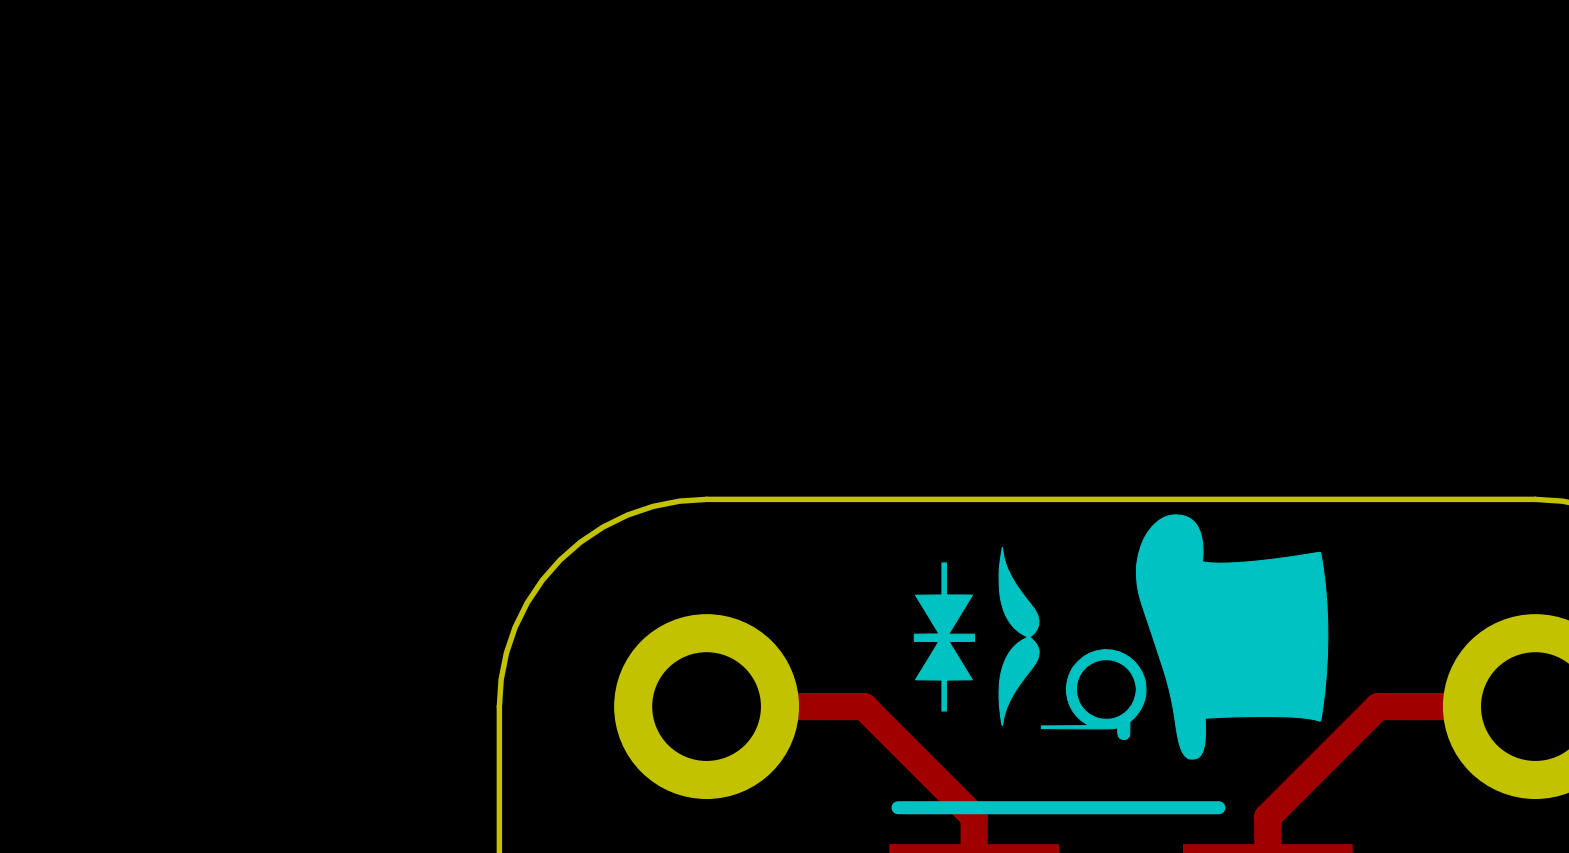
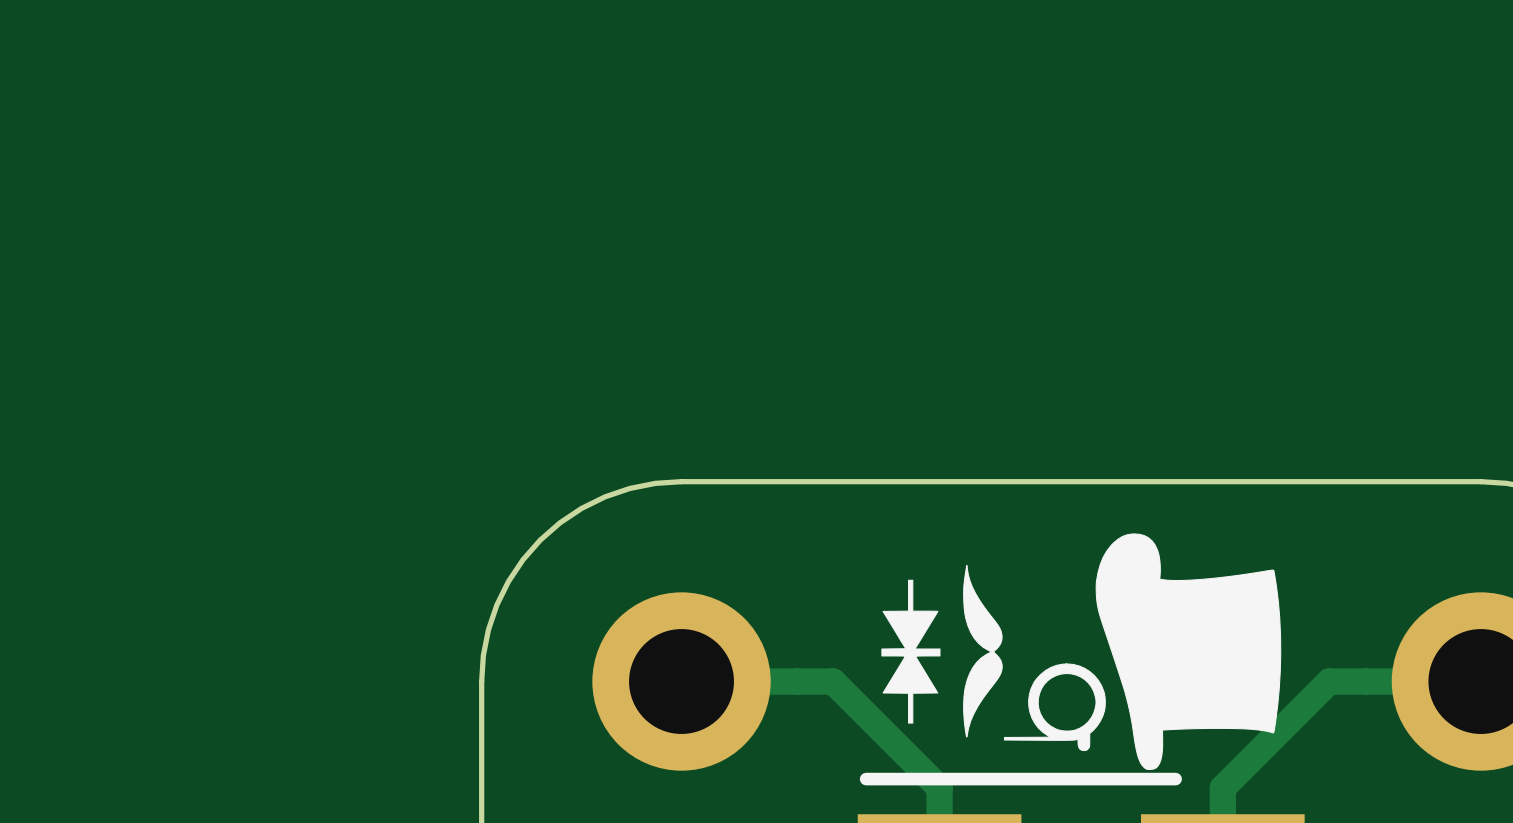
drawing position: (1121, 636) -> (1081, 651)

